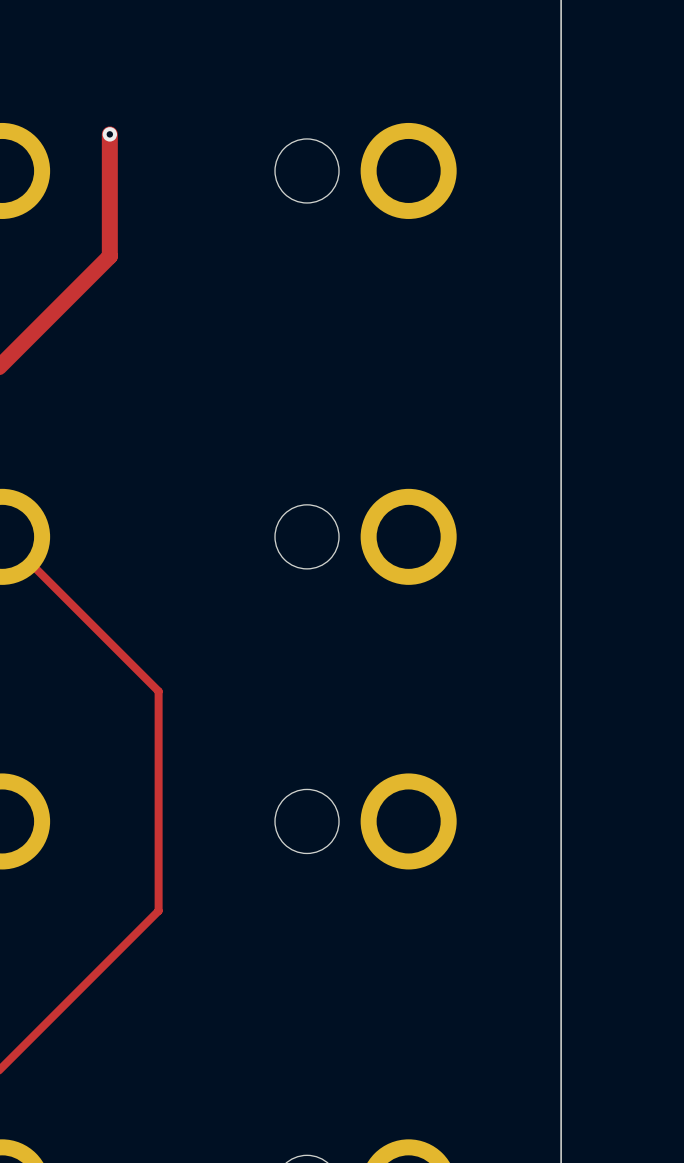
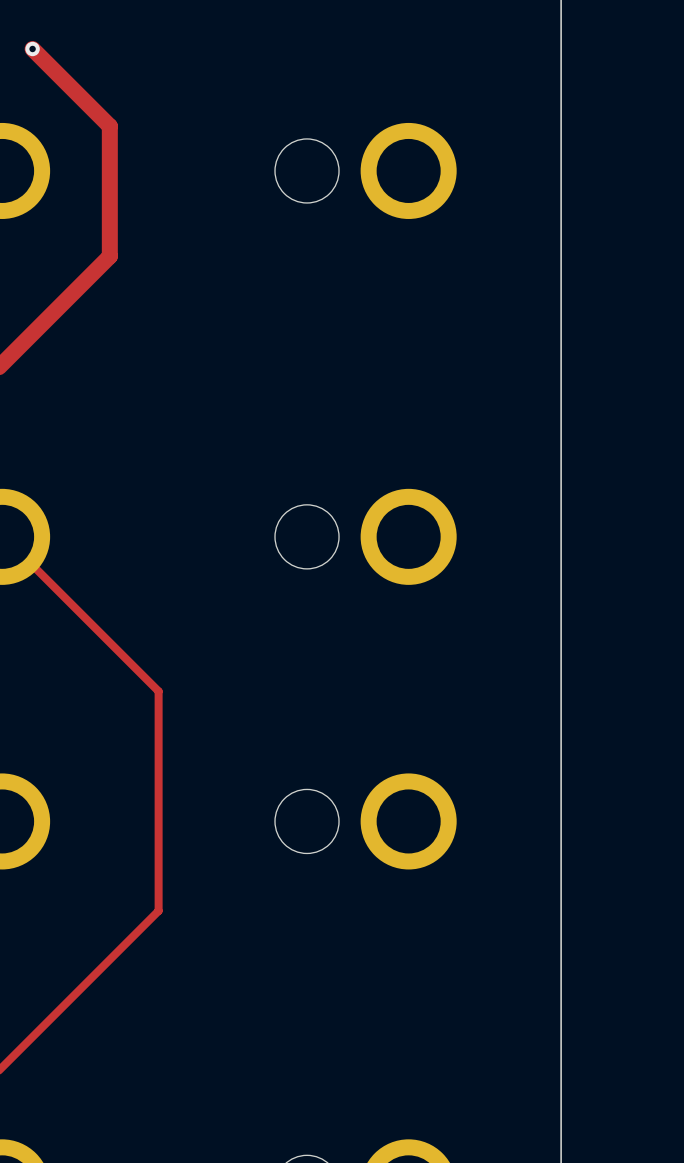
track: none -> (32, 48) (109, 126) (109, 134)
via position: (109, 134) -> (32, 48)

